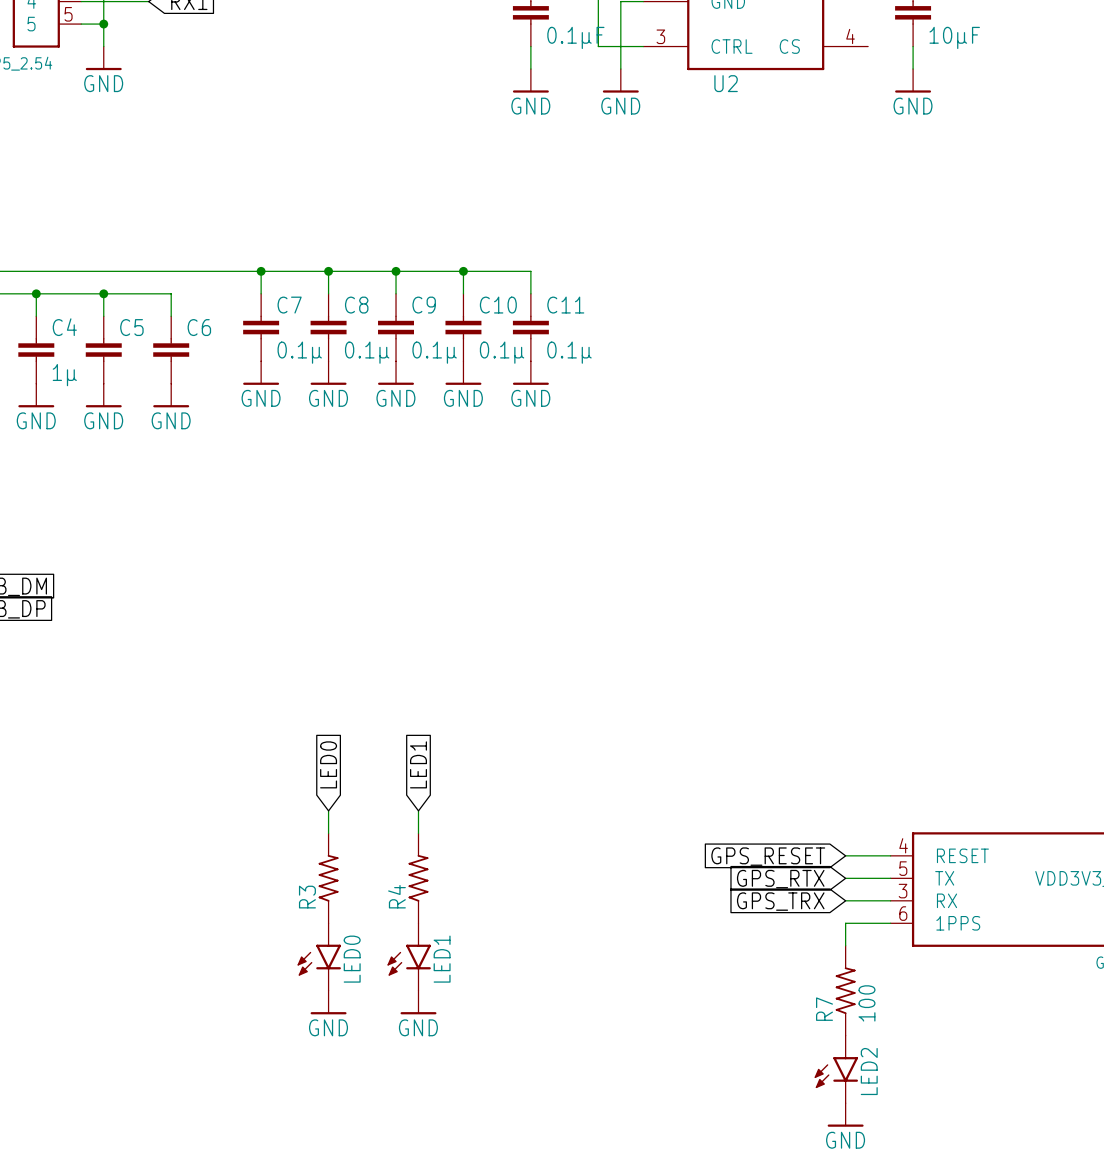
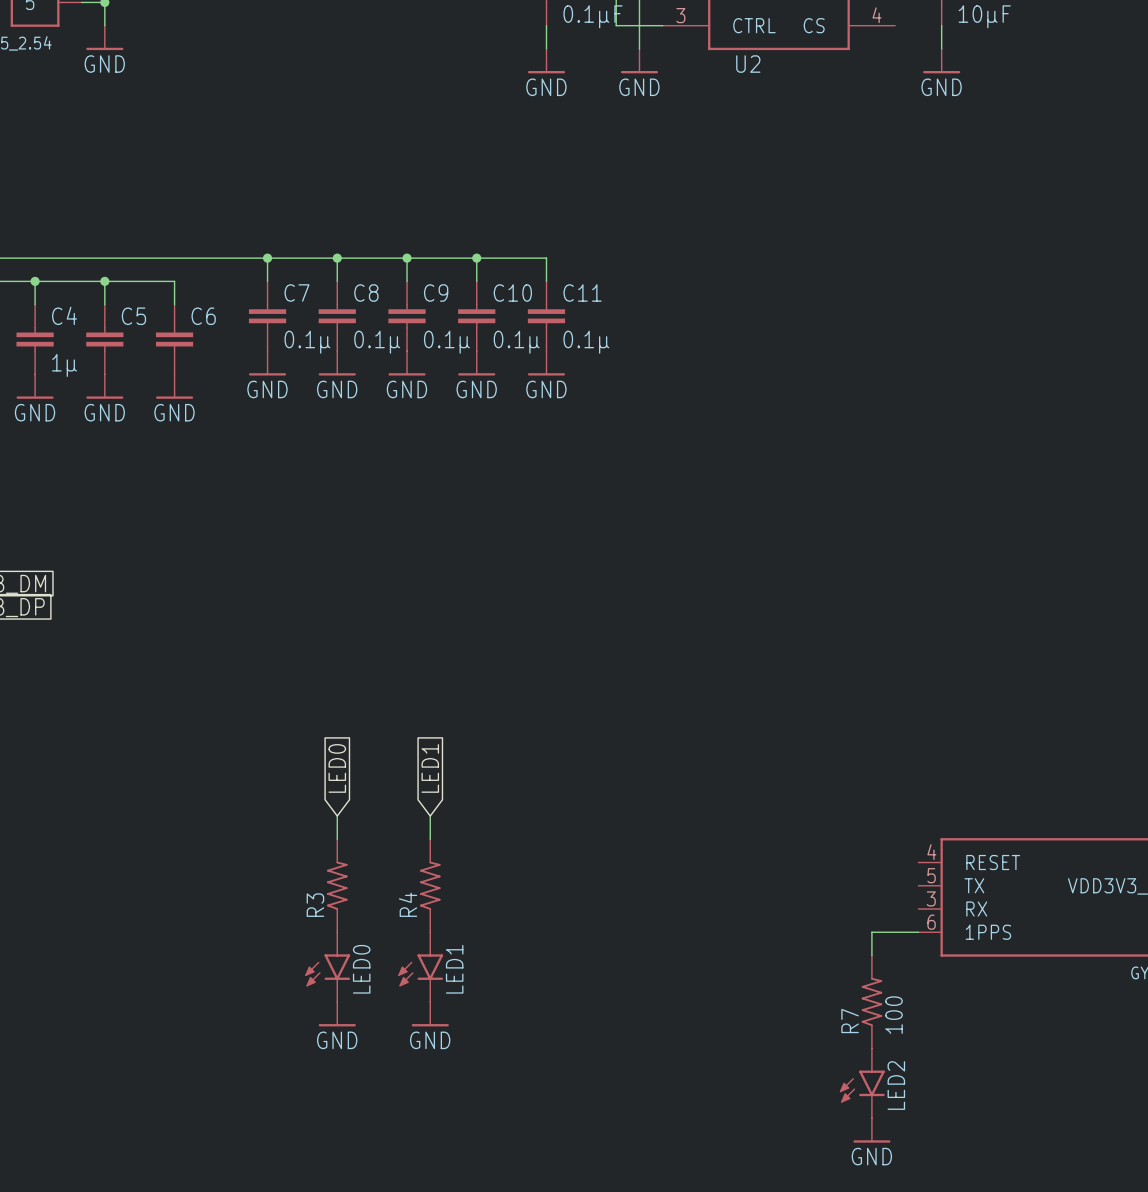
wire: (845, 855) (890, 855) -> none
global label: GPS_RESET (768, 856) -> none
wire: (845, 878) (890, 878) -> none
global label: GPS_RTX (780, 879) -> none
wire: (845, 900) (890, 900) -> none
global label: GPS_TRX (780, 901) -> none

